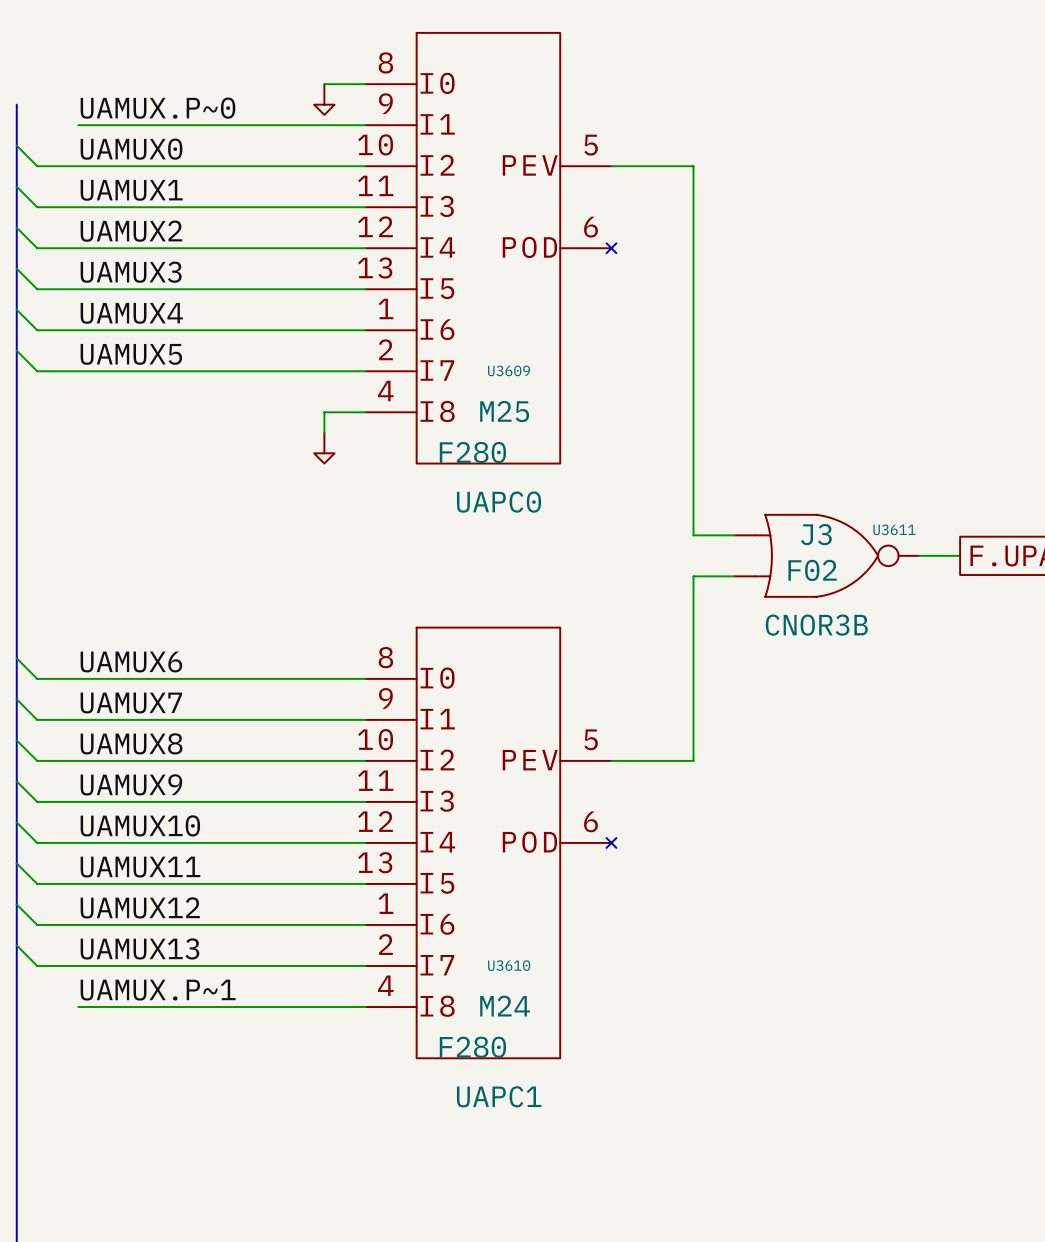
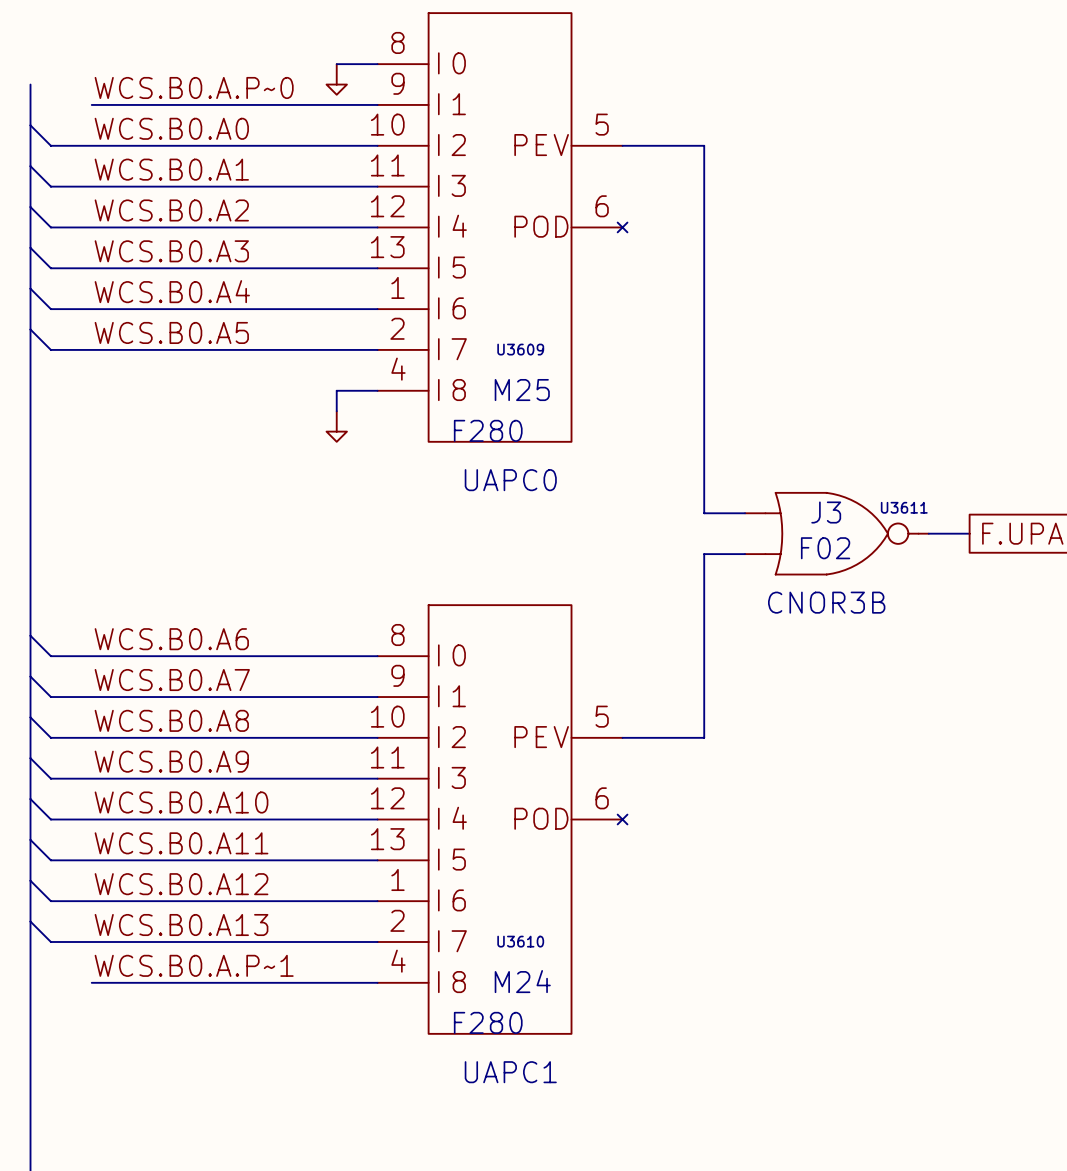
label: UAMUX.P~0 (157, 108) -> WCS.B0.A.P~0 (194, 87)
label: UAMUX0 (131, 149) -> WCS.B0.A0 (171, 128)
label: UAMUX1 (131, 190) -> WCS.B0.A1 (171, 169)
label: UAMUX2 (131, 231) -> WCS.B0.A2 (171, 210)
label: UAMUX3 (131, 272) -> WCS.B0.A3 (171, 251)
label: UAMUX4 (131, 313) -> WCS.B0.A4 (172, 291)
label: UAMUX5 (131, 354) -> WCS.B0.A5 (171, 332)
label: UAMUX6 (131, 662) -> WCS.B0.A6 (171, 639)
label: UAMUX7 (131, 703) -> WCS.B0.A7 (172, 680)
label: UAMUX8 (131, 743) -> WCS.B0.A8 (171, 720)
label: UAMUX9 (131, 784) -> WCS.B0.A9 (171, 761)
label: UAMUX10 (140, 825) -> WCS.B0.A10 (181, 802)
label: UAMUX11 (140, 867) -> WCS.B0.A11 (181, 843)
label: UAMUX12 (140, 907) -> WCS.B0.A12 (181, 884)
label: UAMUX13 (139, 948) -> WCS.B0.A13 (181, 925)
label: UAMUX.P~1 (158, 990) -> WCS.B0.A.P~1 (194, 965)

